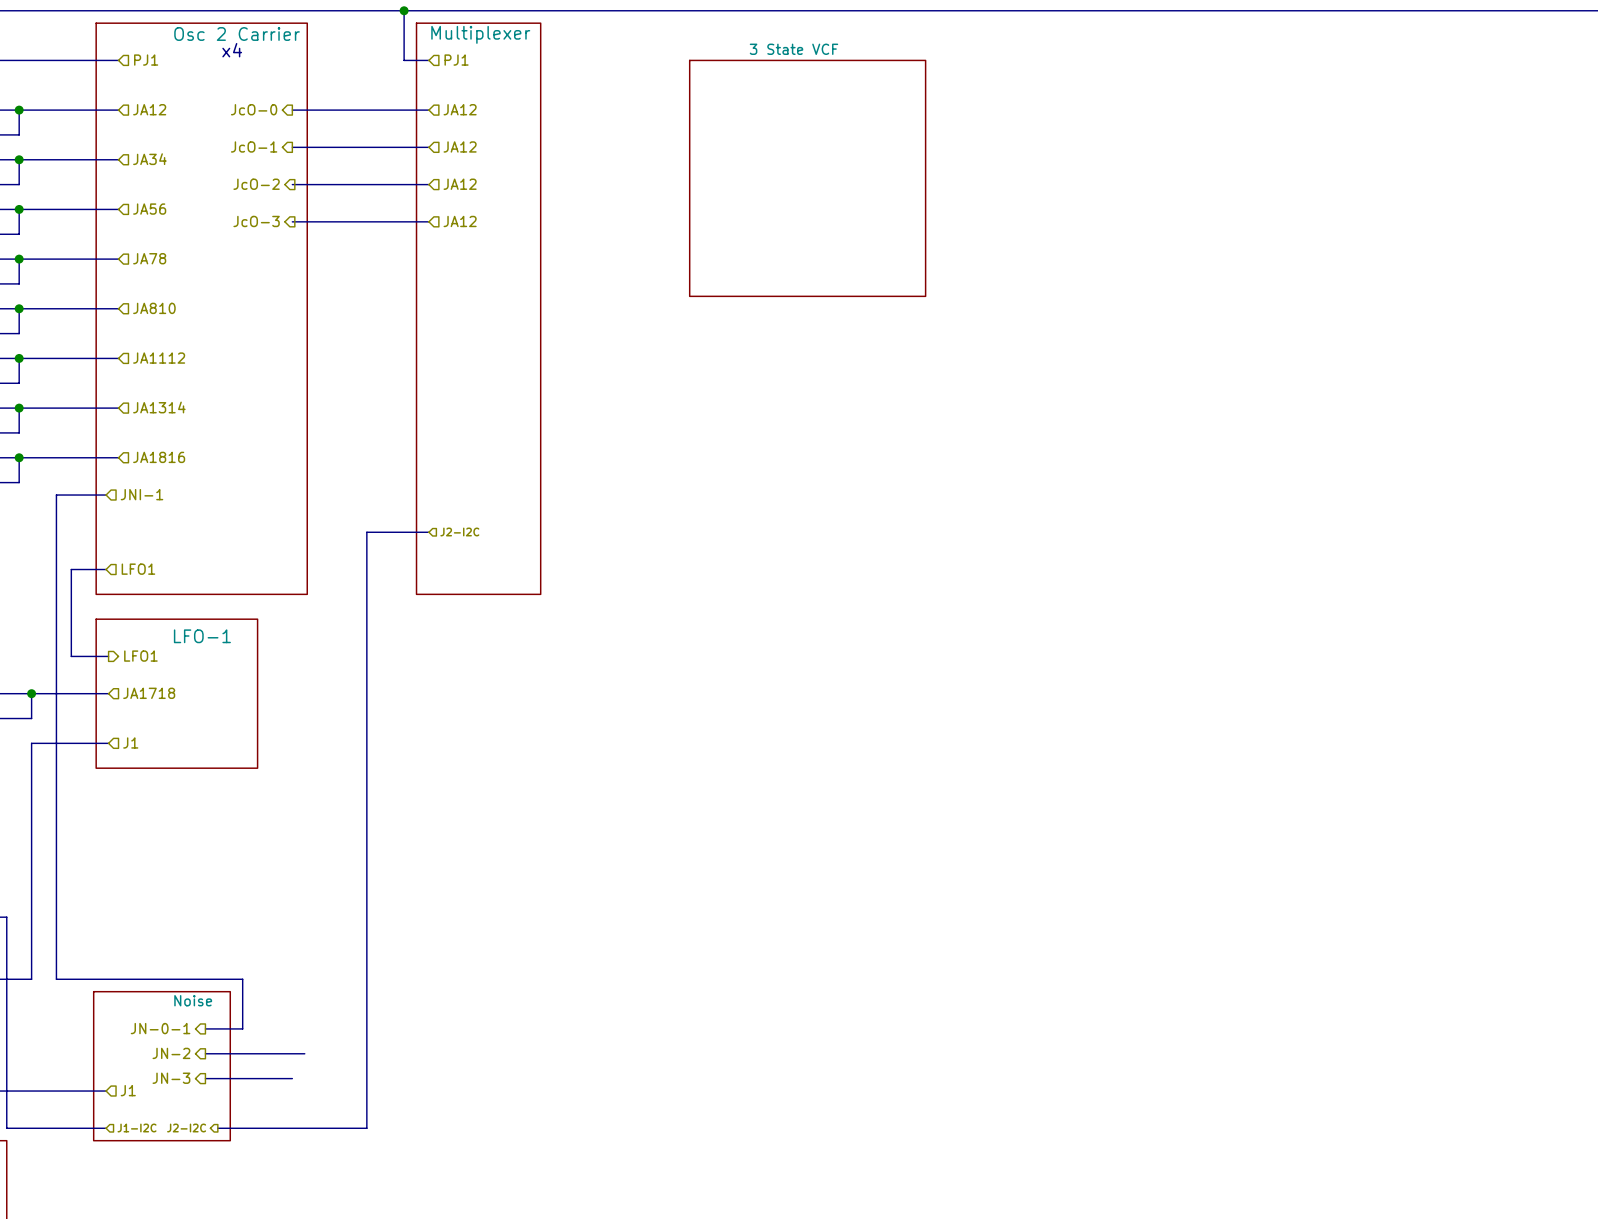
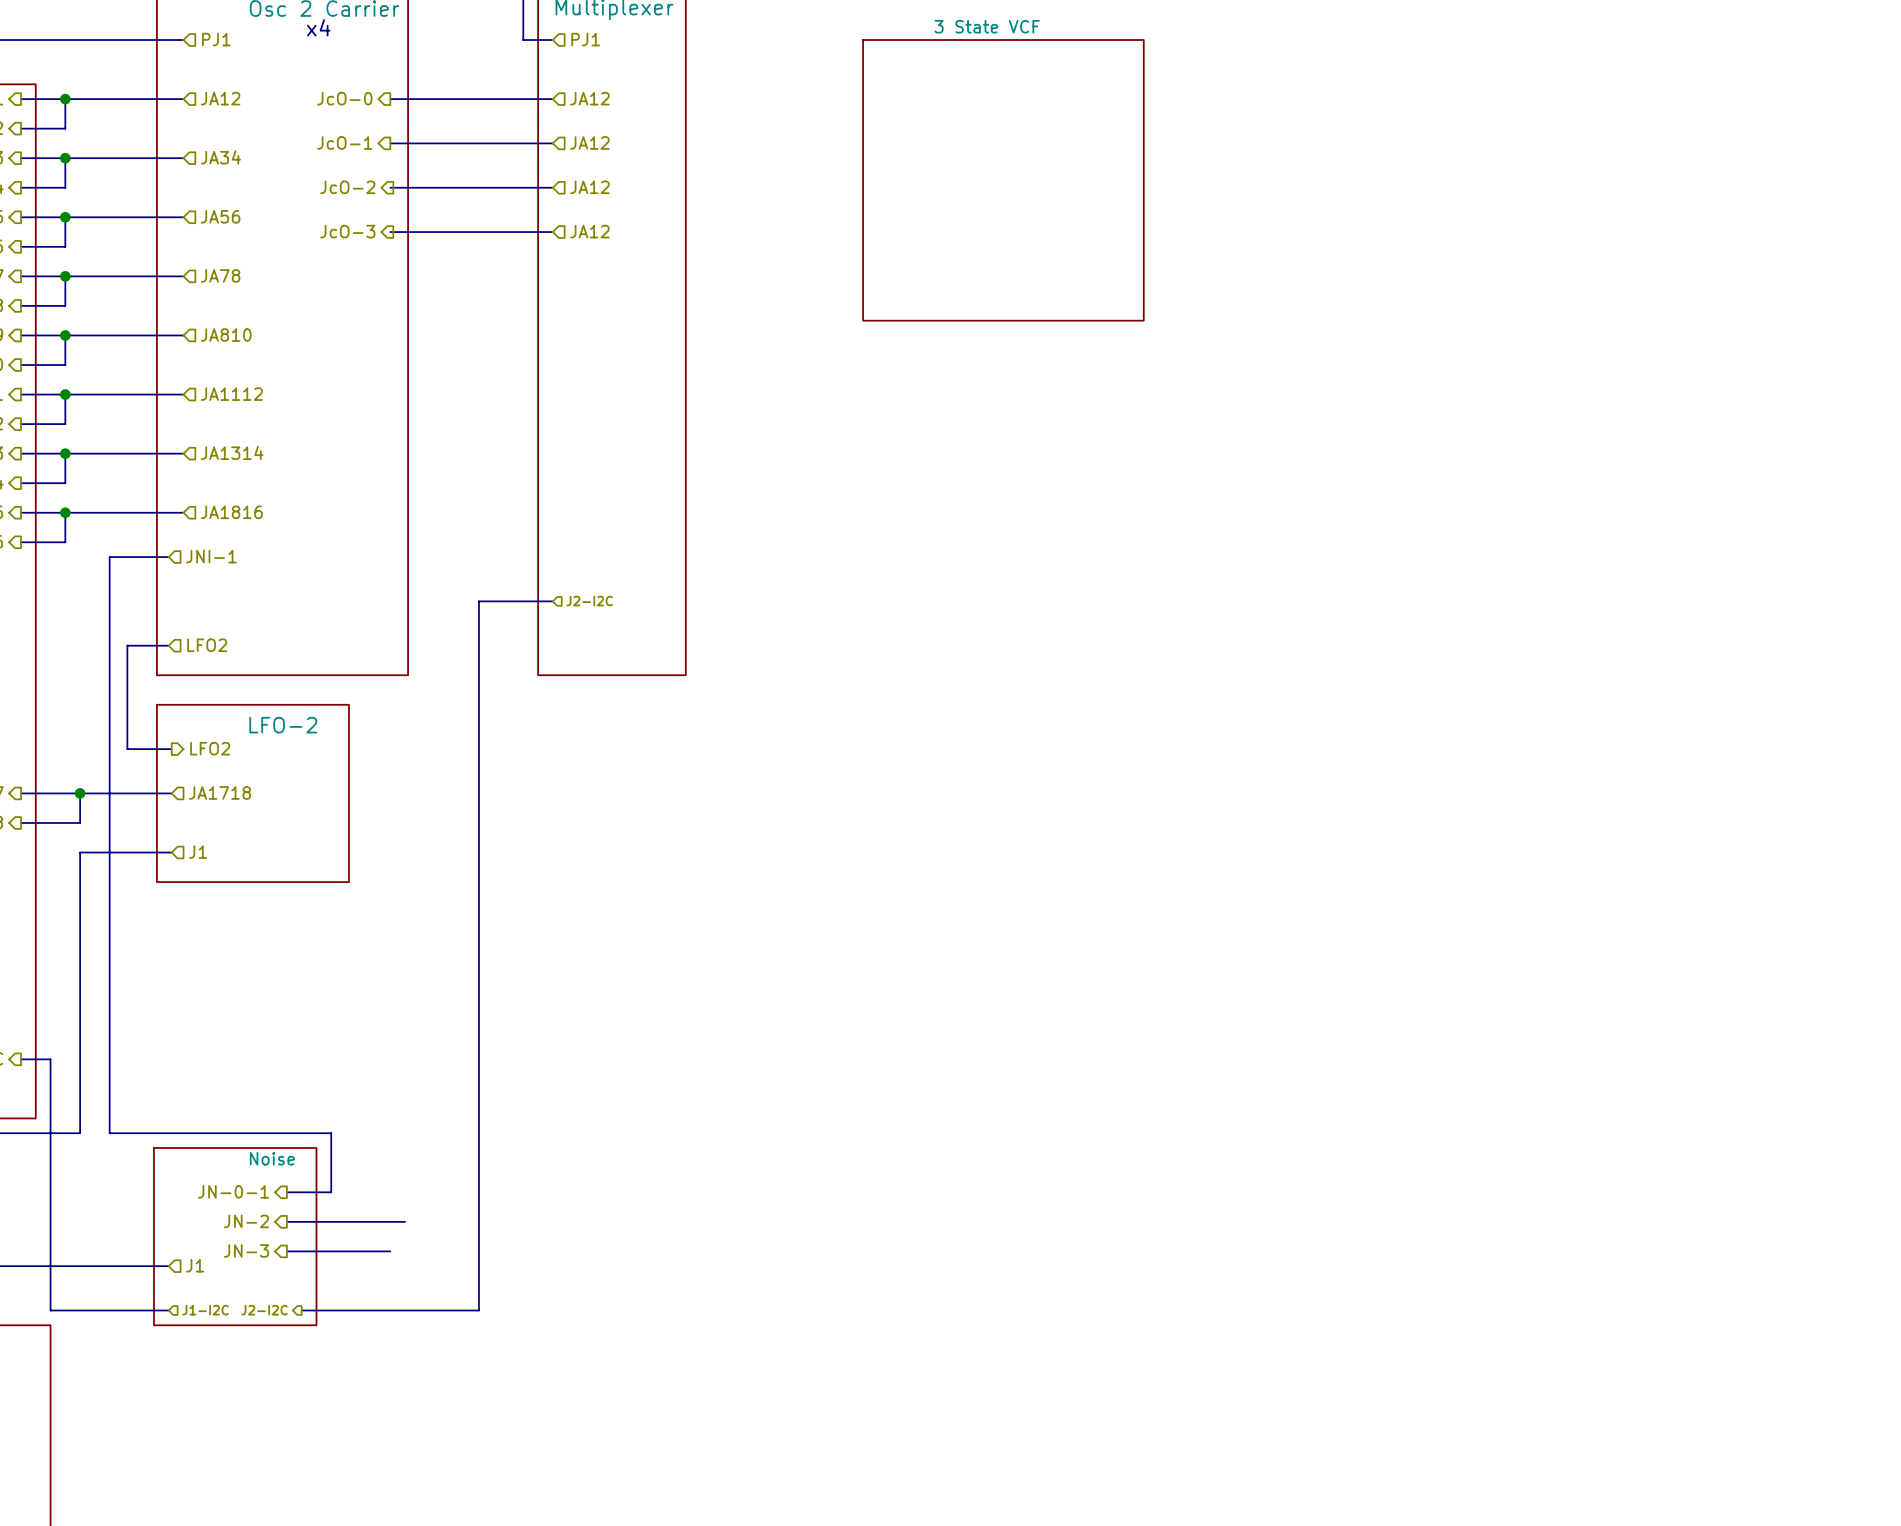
hierarchical label: LFO1 (138, 569) -> LFO2 (207, 645)
sheet LFO-1 name: LFO-1 (202, 636) -> LFO-2 (283, 725)
hierarchical label: LFO1 (140, 656) -> LFO2 (210, 748)

